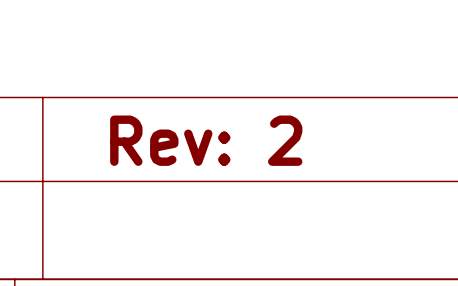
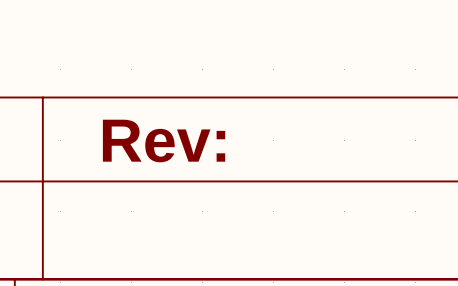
title block: Rev: 2 (206, 140) -> Rev: (164, 140)

